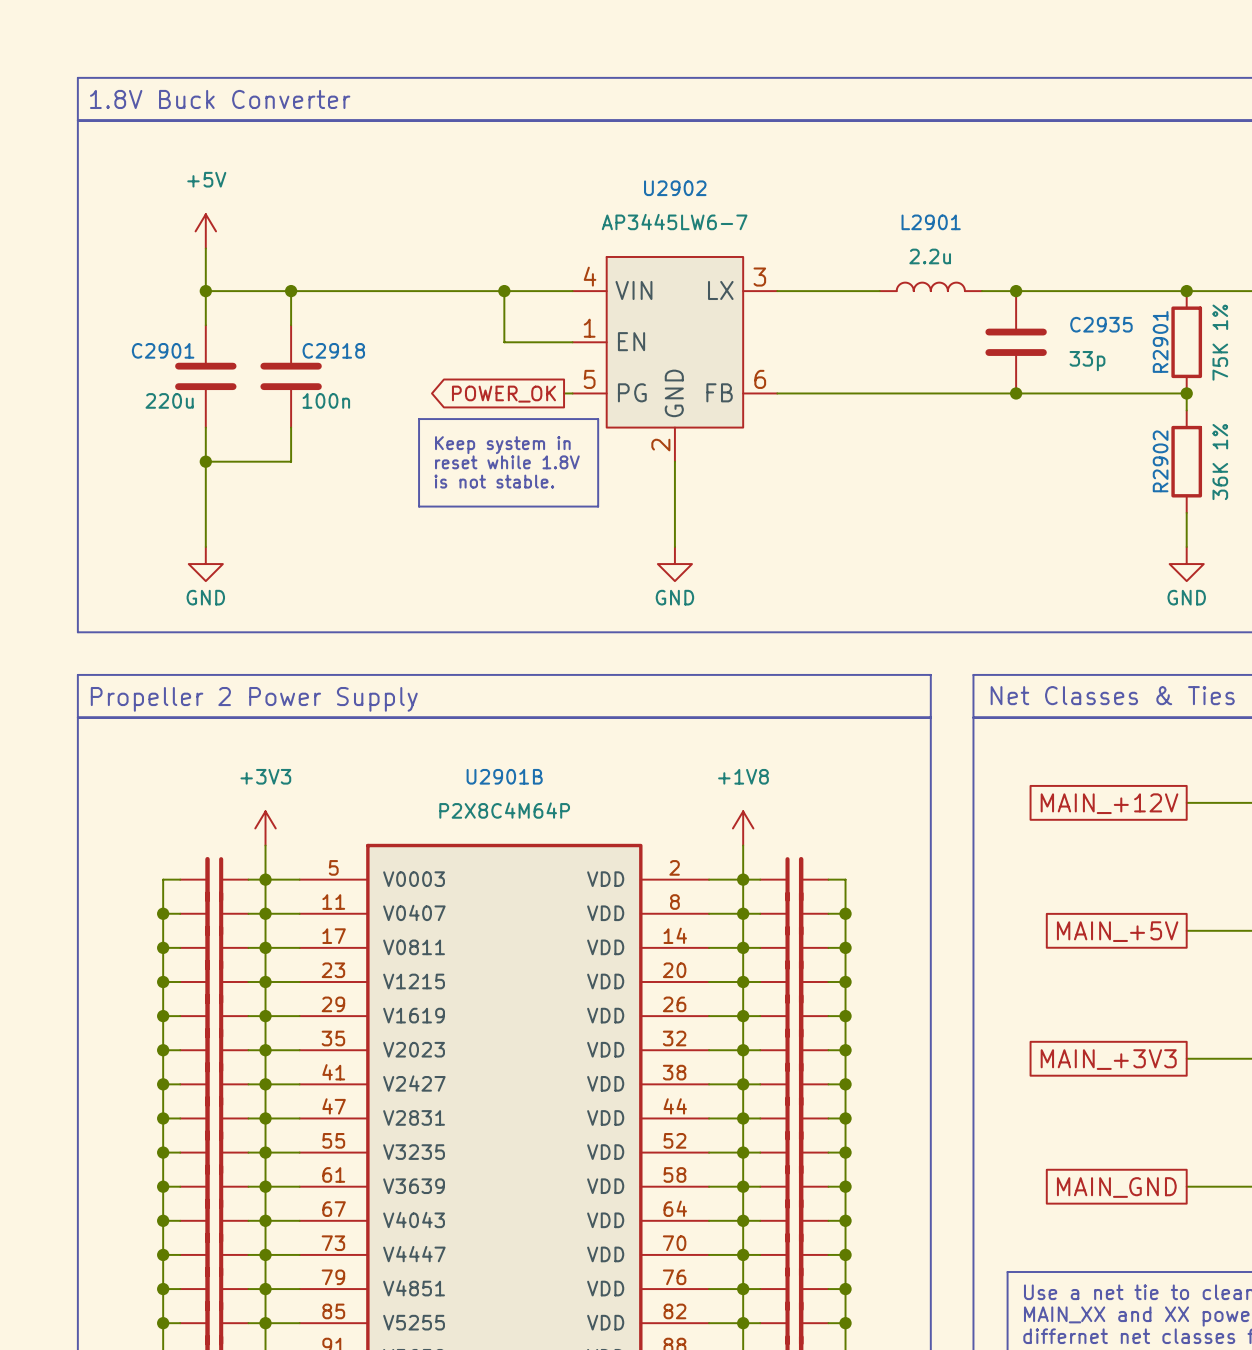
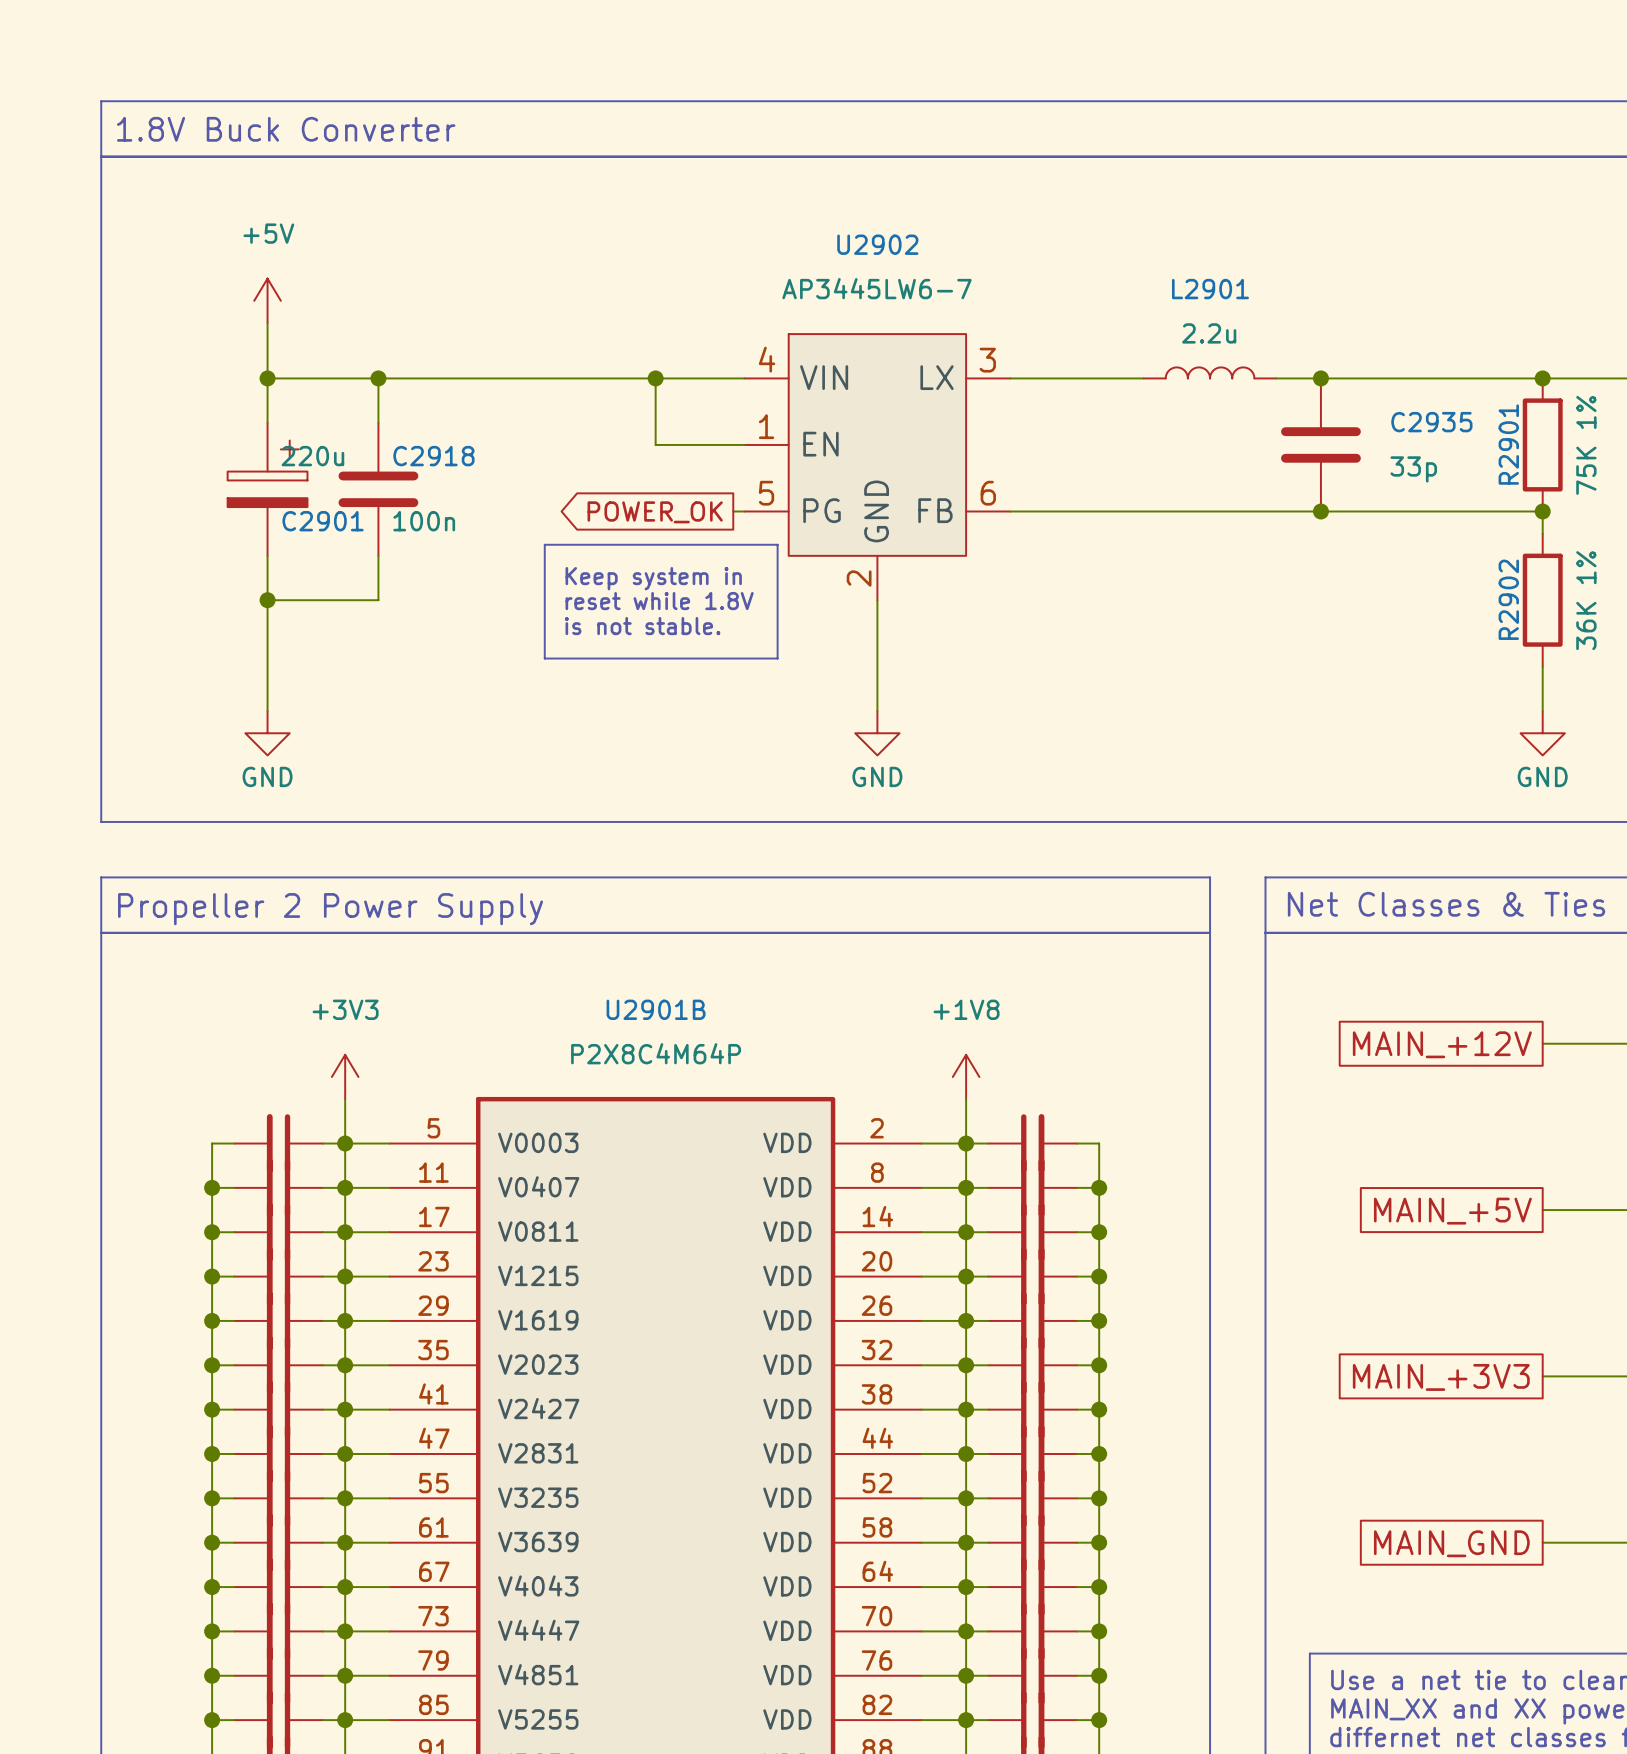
C2901 symbol: [175, 325, 237, 428] -> [227, 422, 308, 556]
C2901 name position: C2901 (163, 350) -> C2901 (323, 521)
C2901 value position: 220u (169, 400) -> 220u (312, 456)

